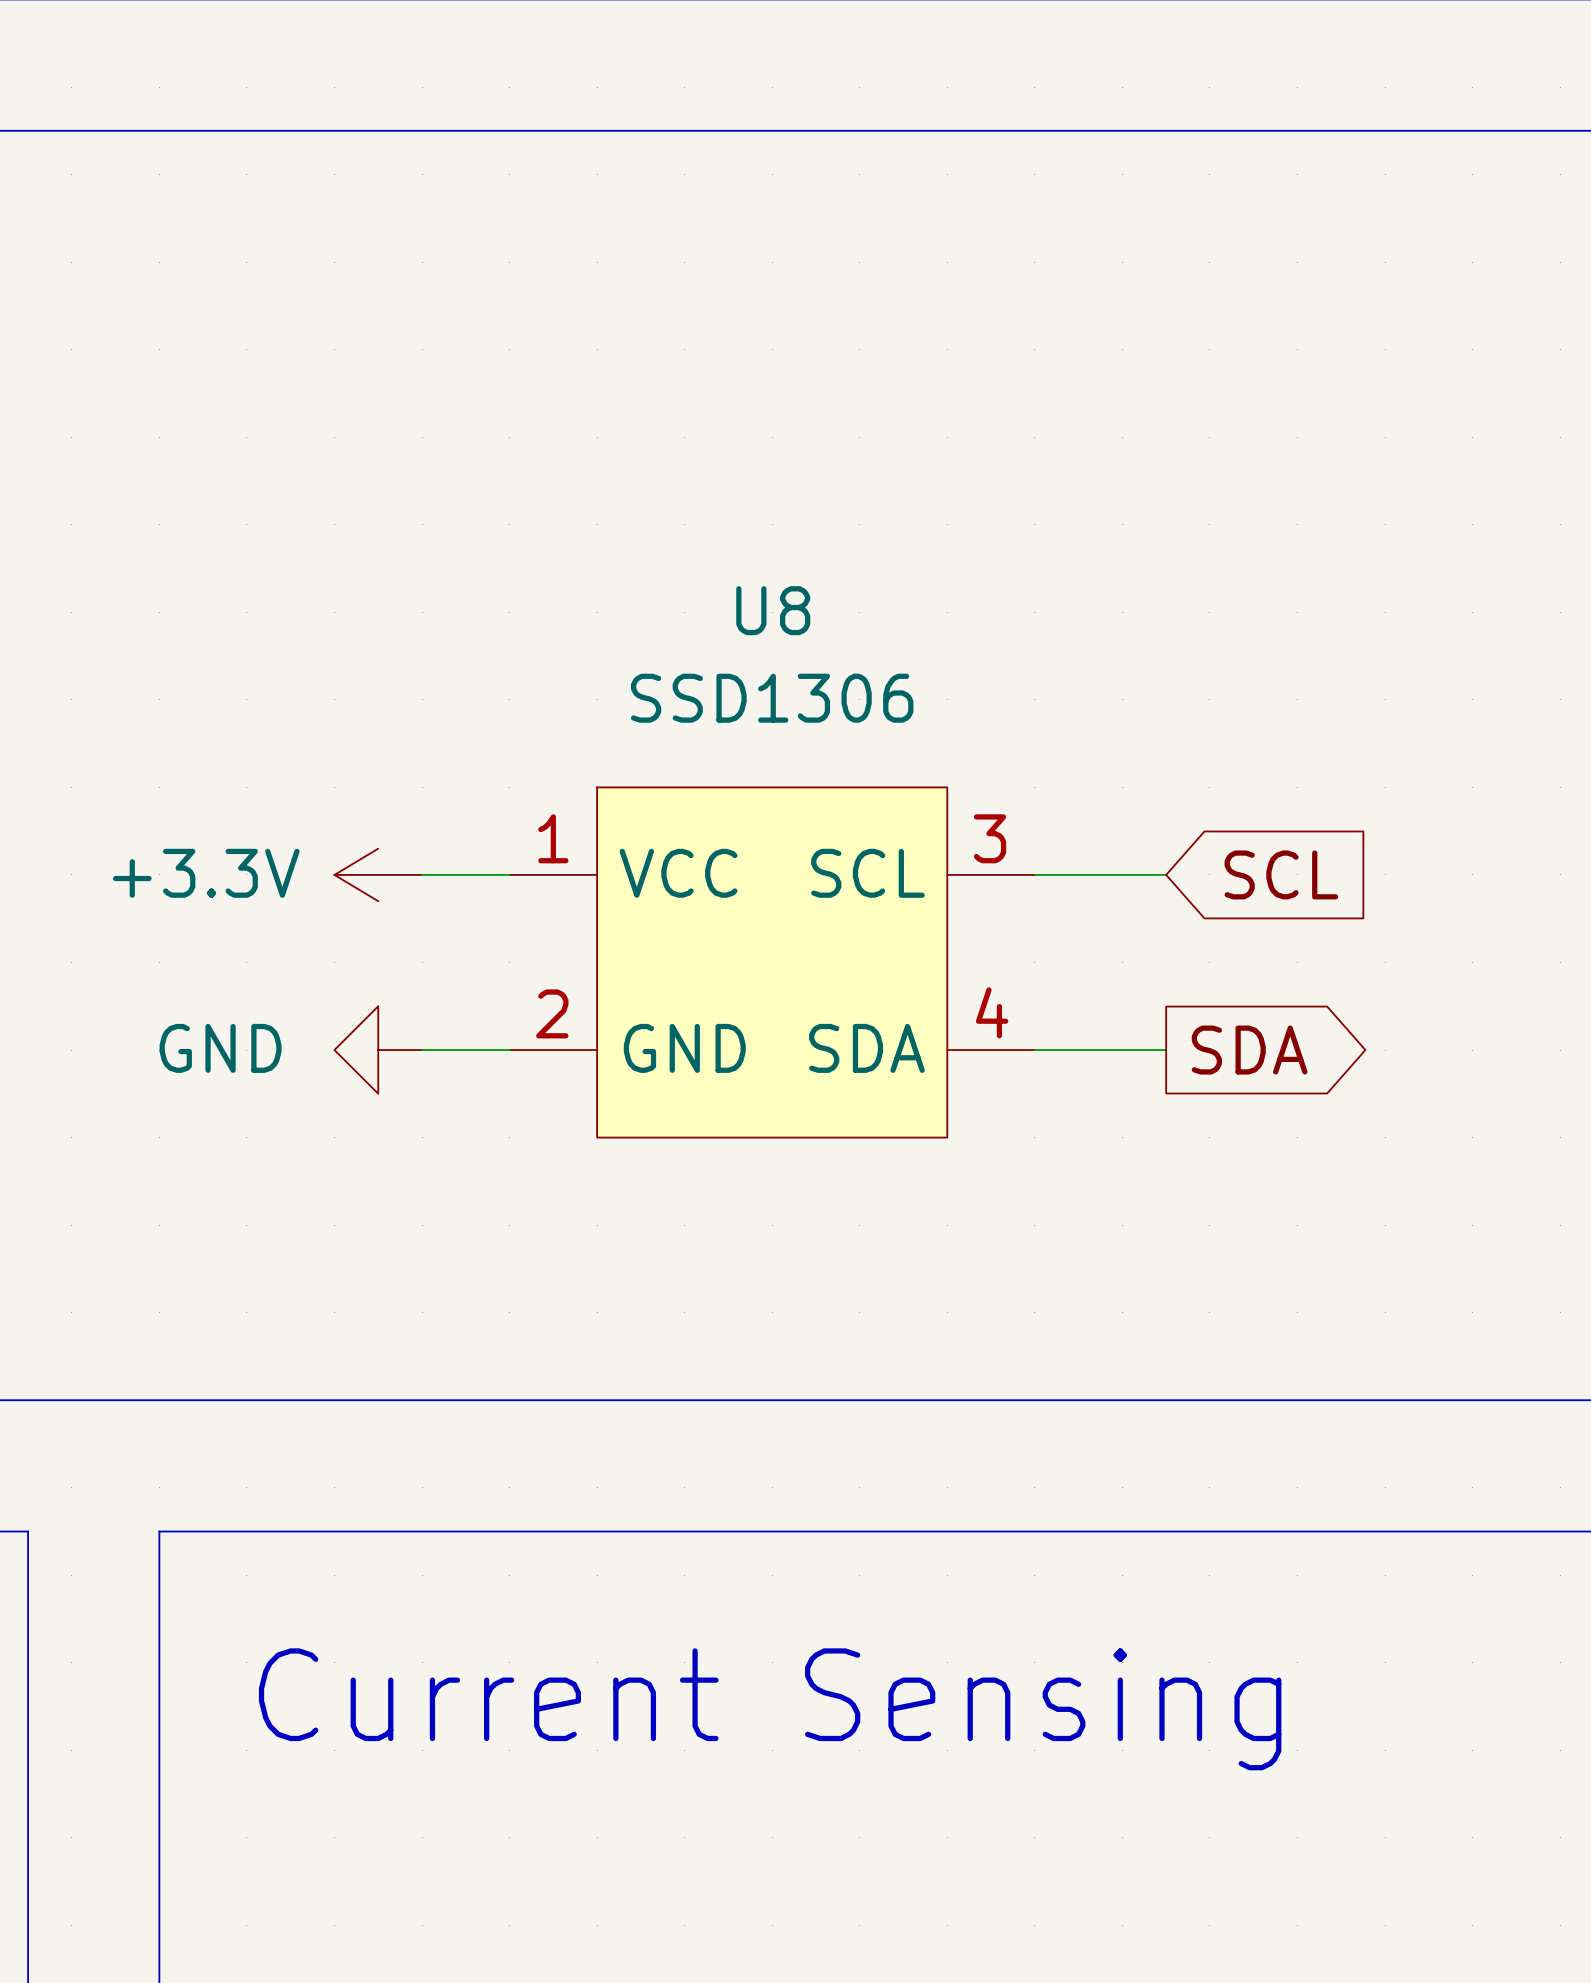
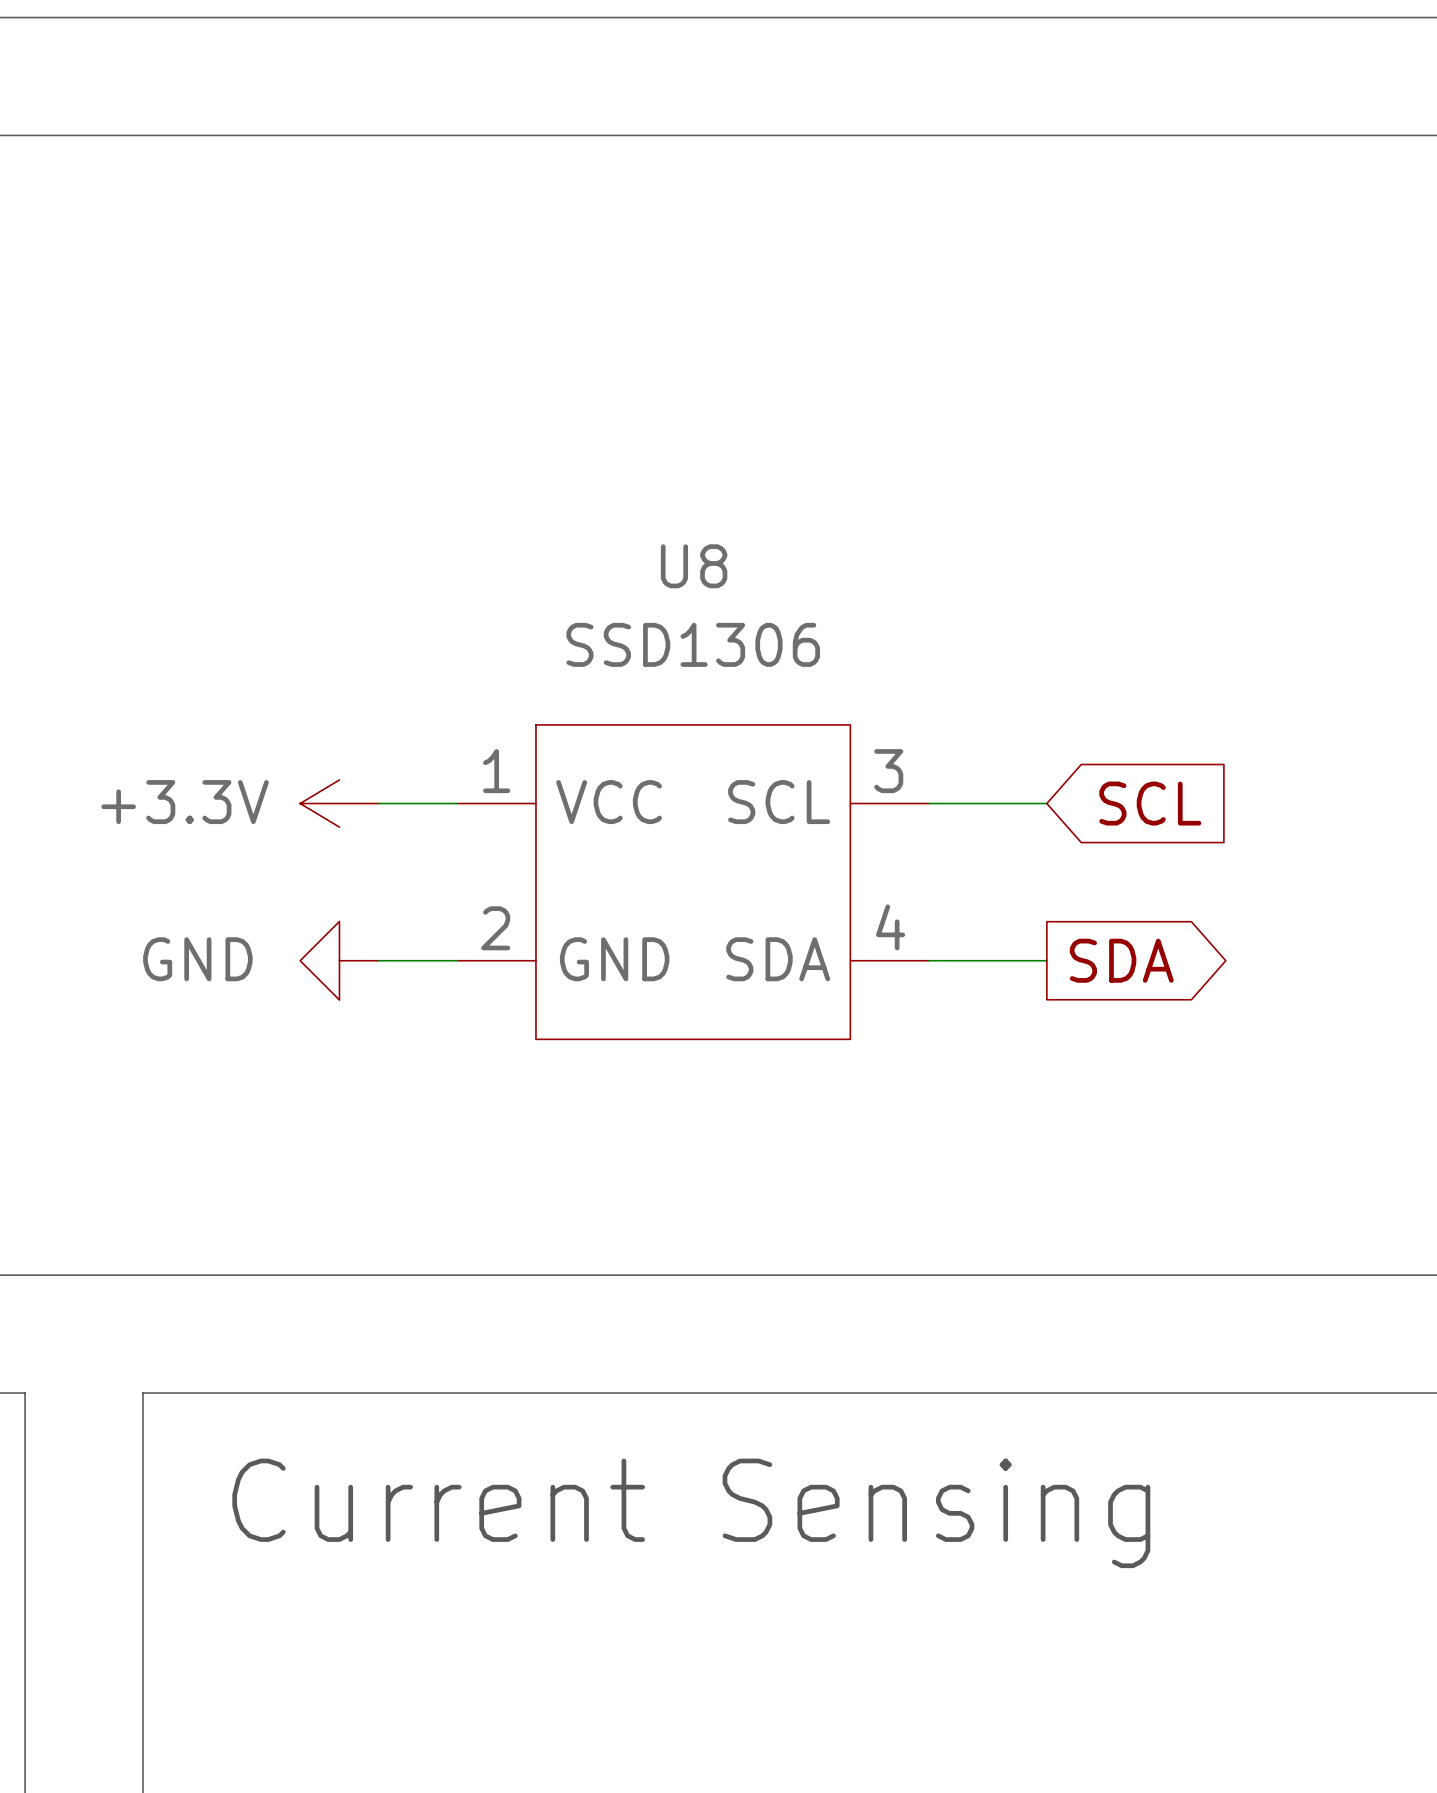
text position: Current Sensing (770, 1709) -> Current Sensing (691, 1513)

